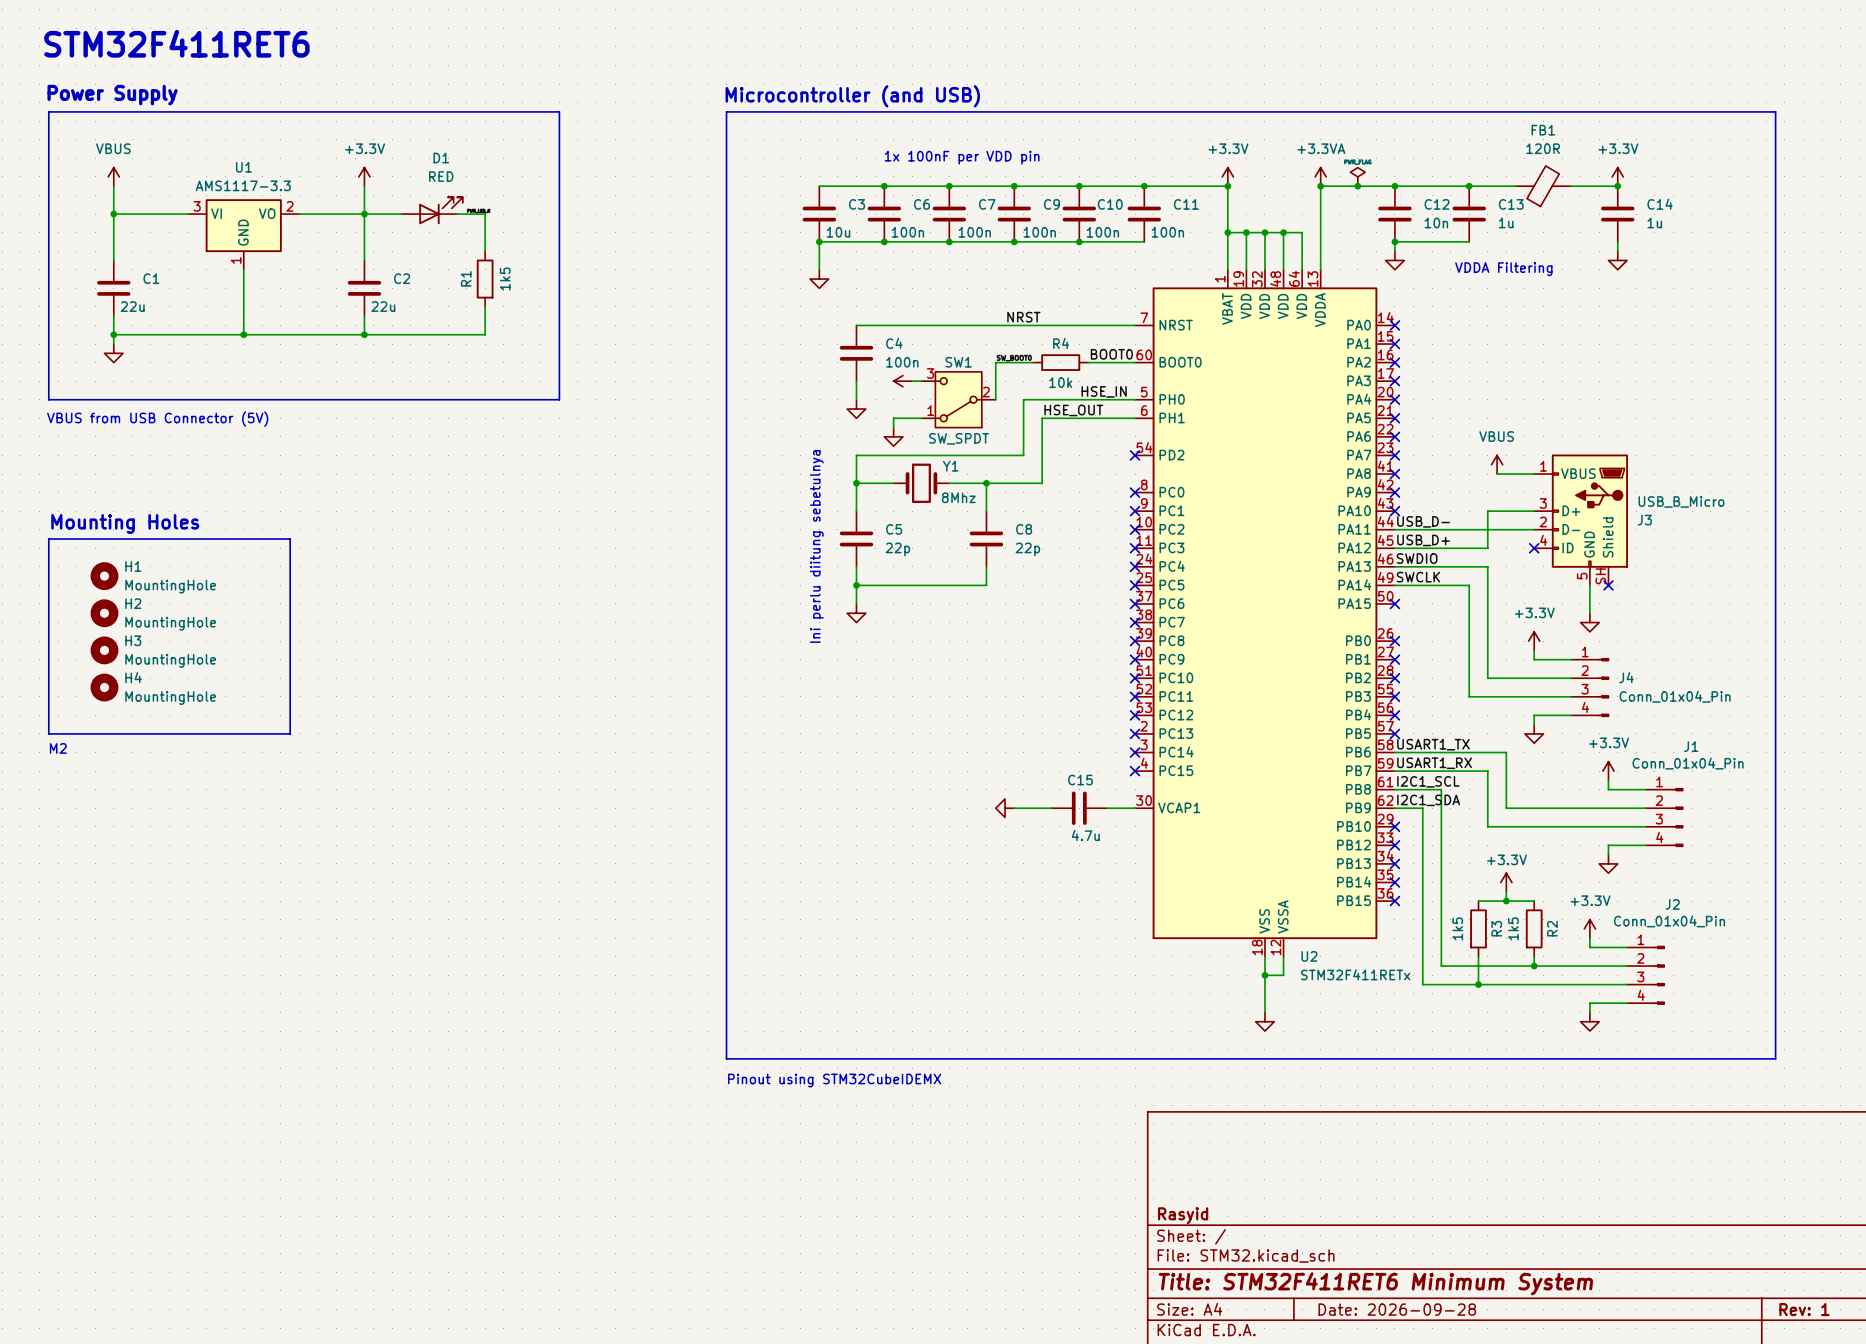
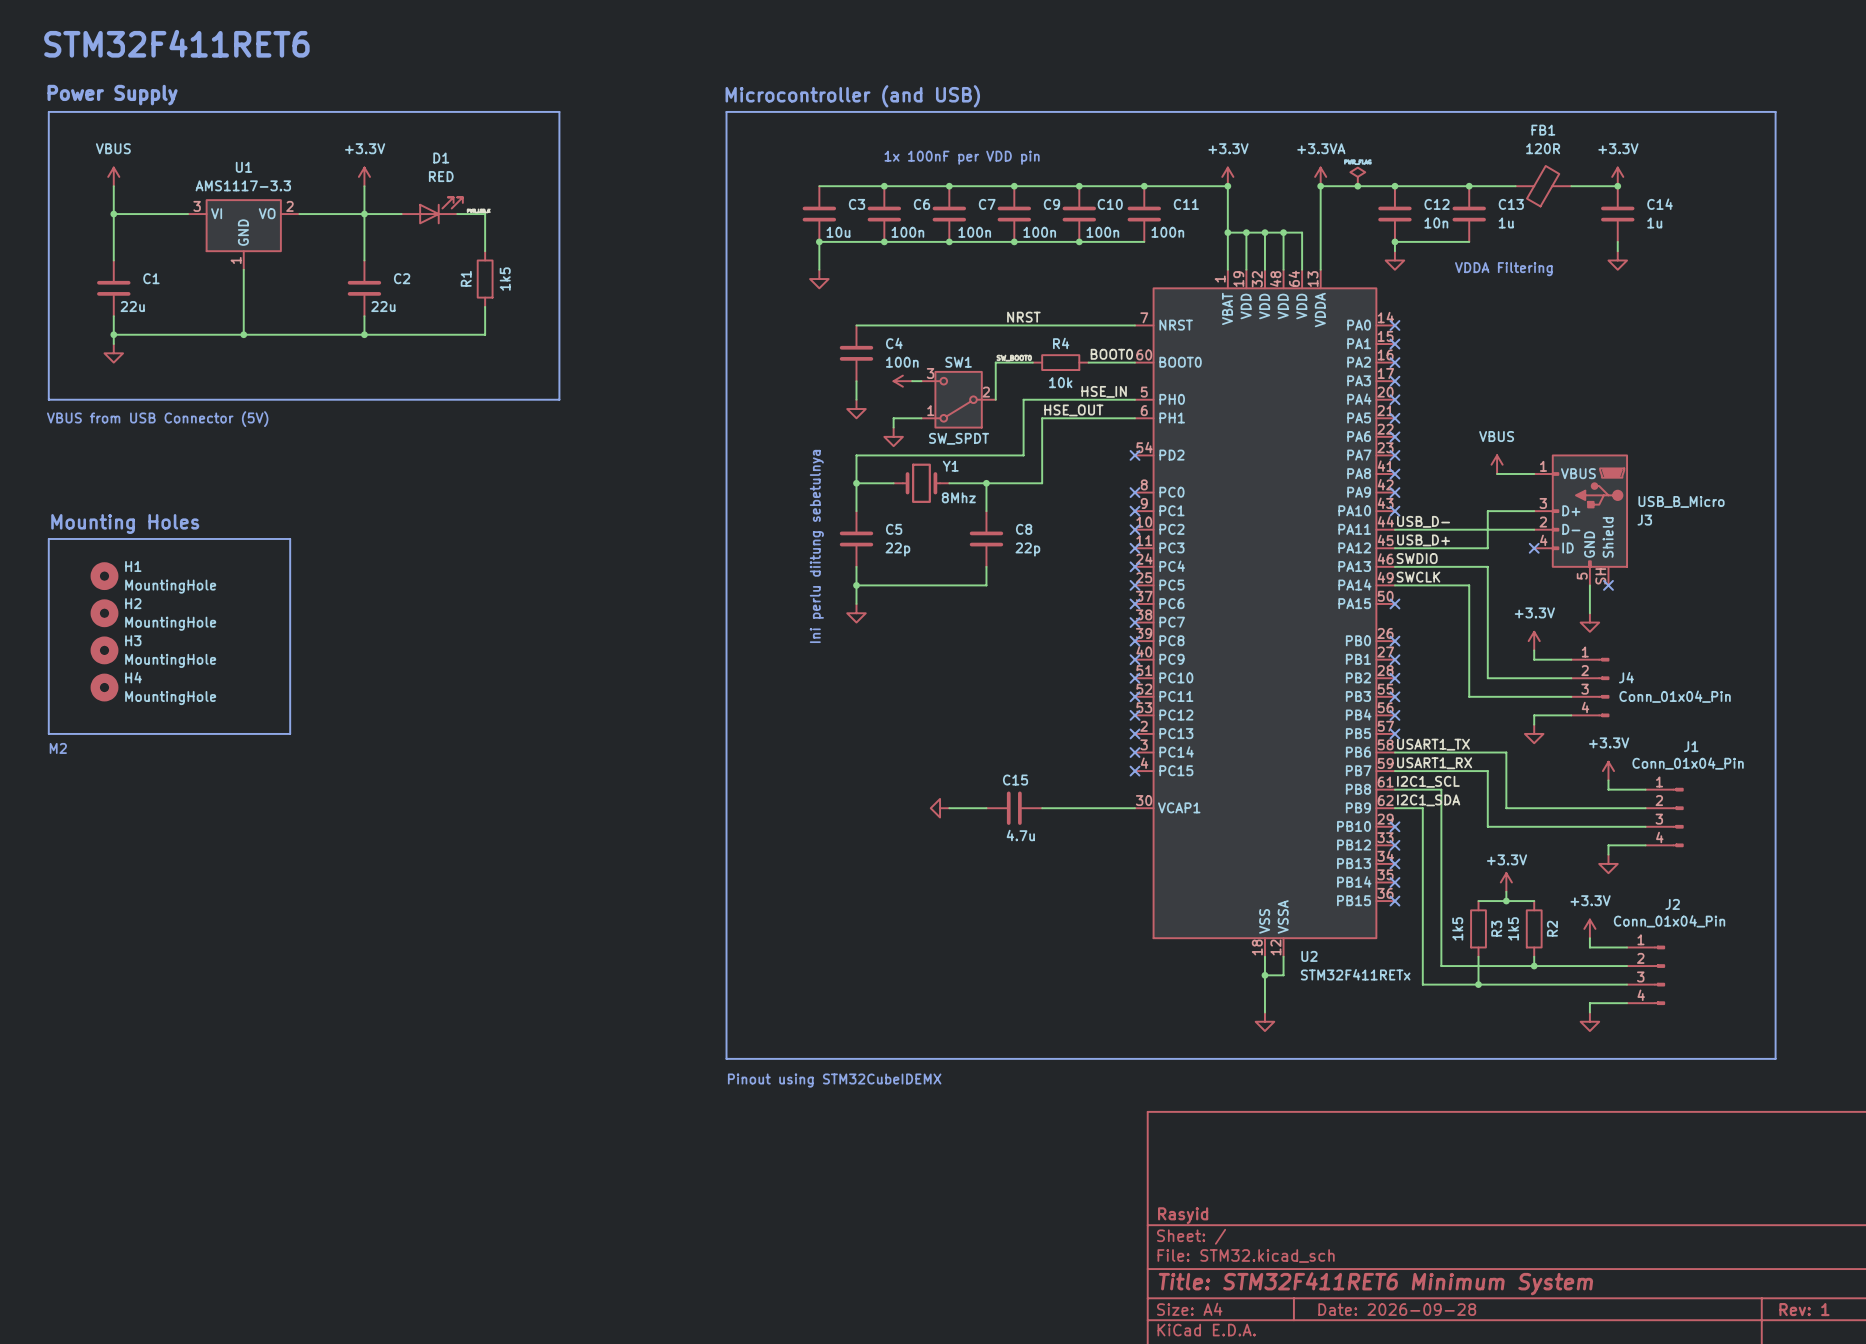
wire: none -> (949, 808) (986, 808)
power symbol position: (1005, 808) -> (940, 808)
C15 position: (1079, 808) -> (1014, 808)

